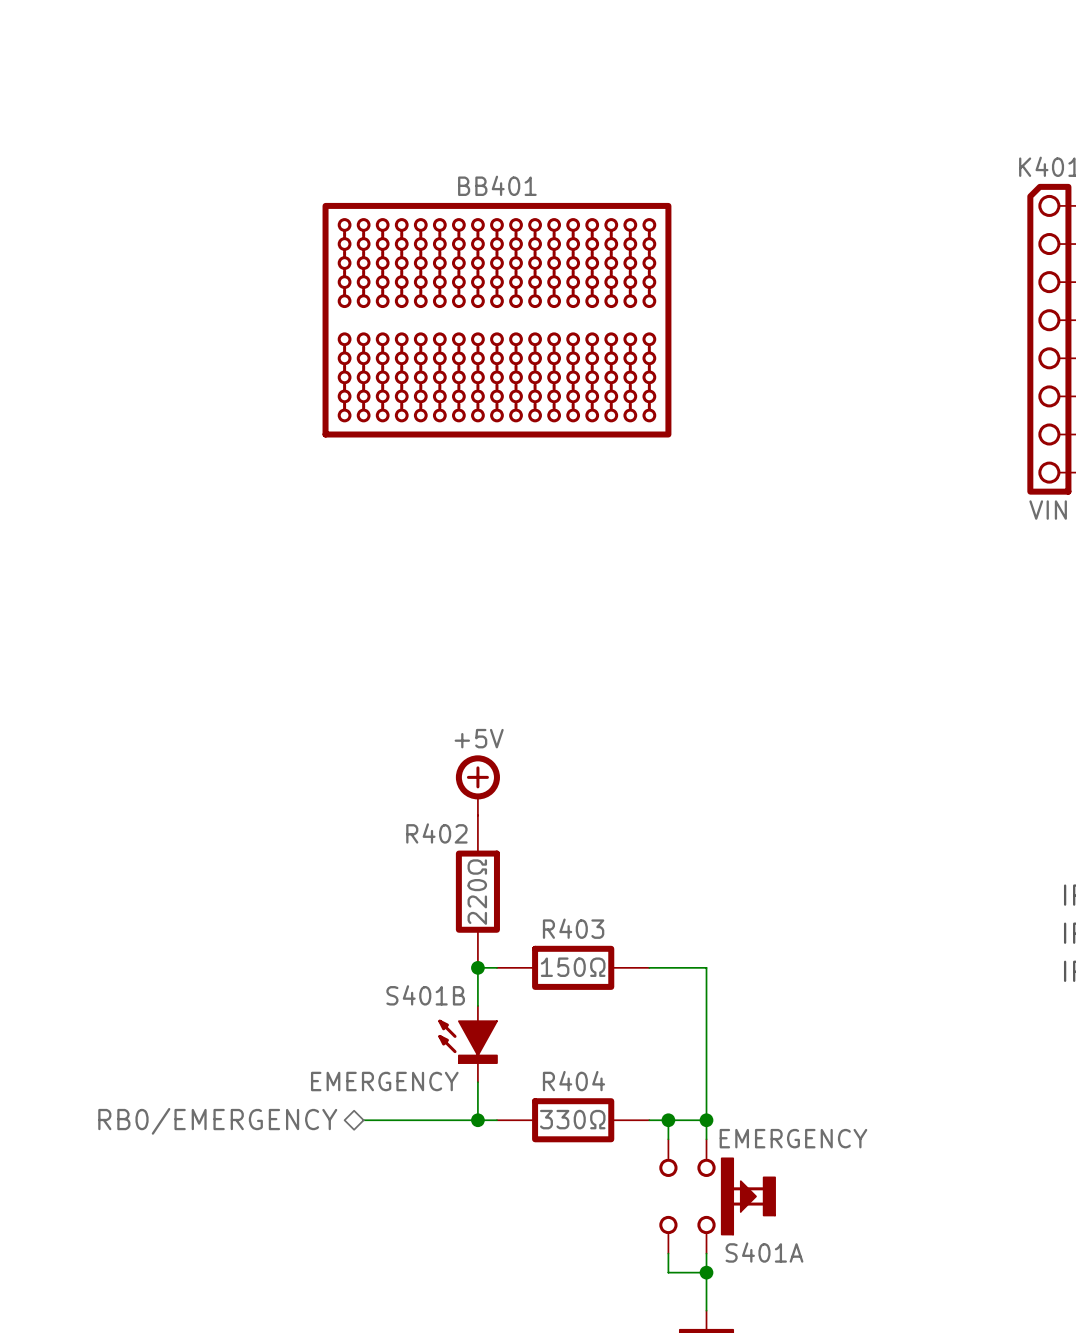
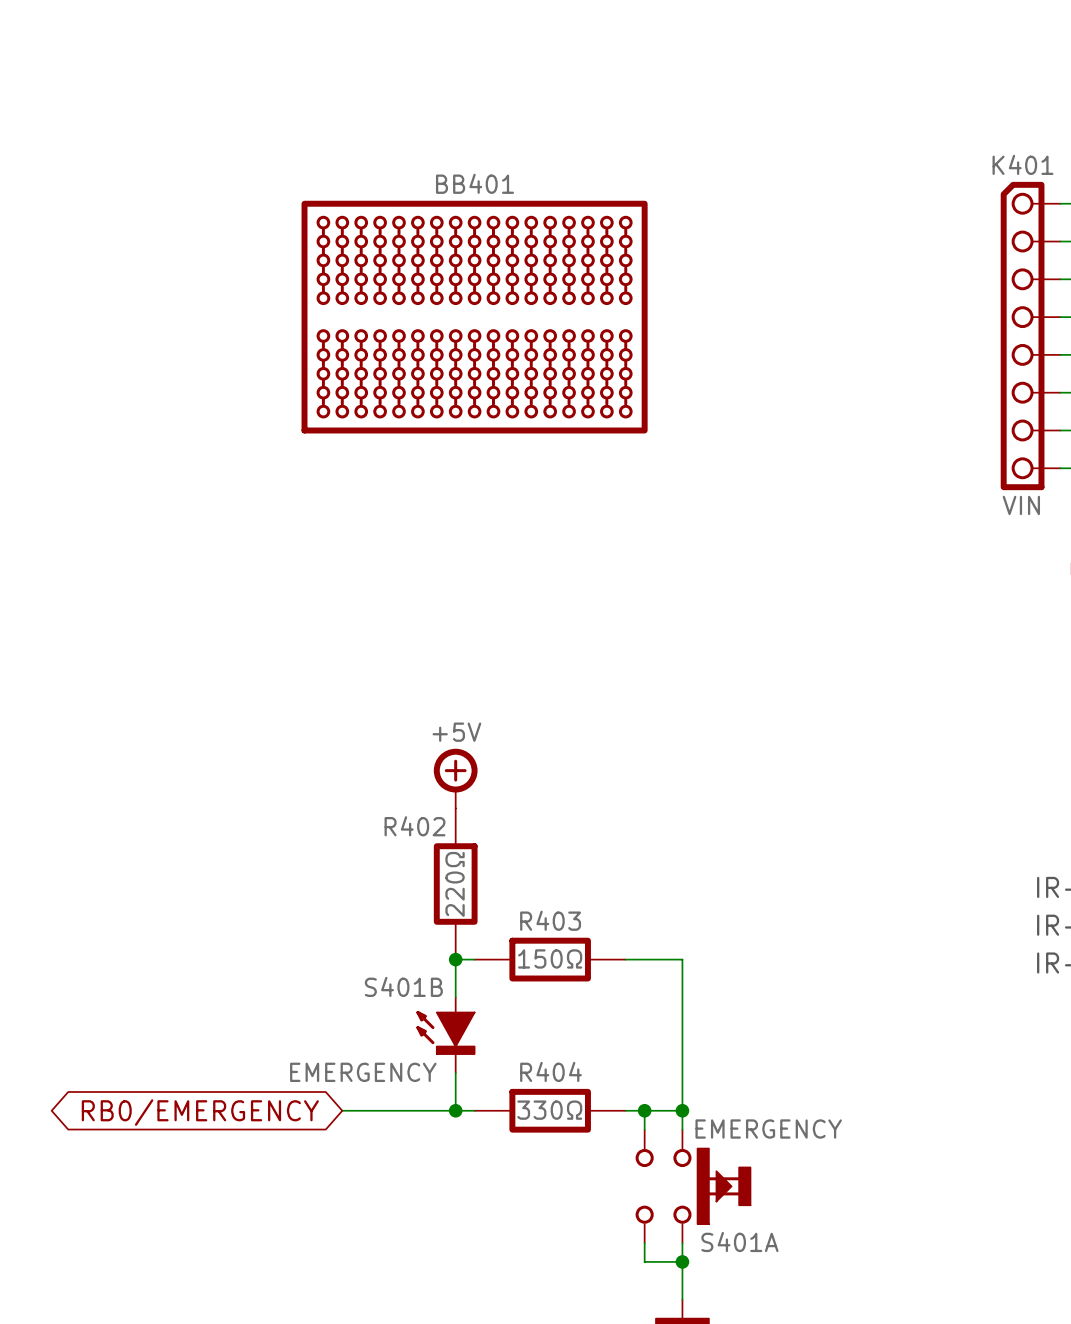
hierarchical label: RB0/EMERGENCY (217, 1121) -> none
global label: none -> RB0/EMERGENCY (200, 1112)

